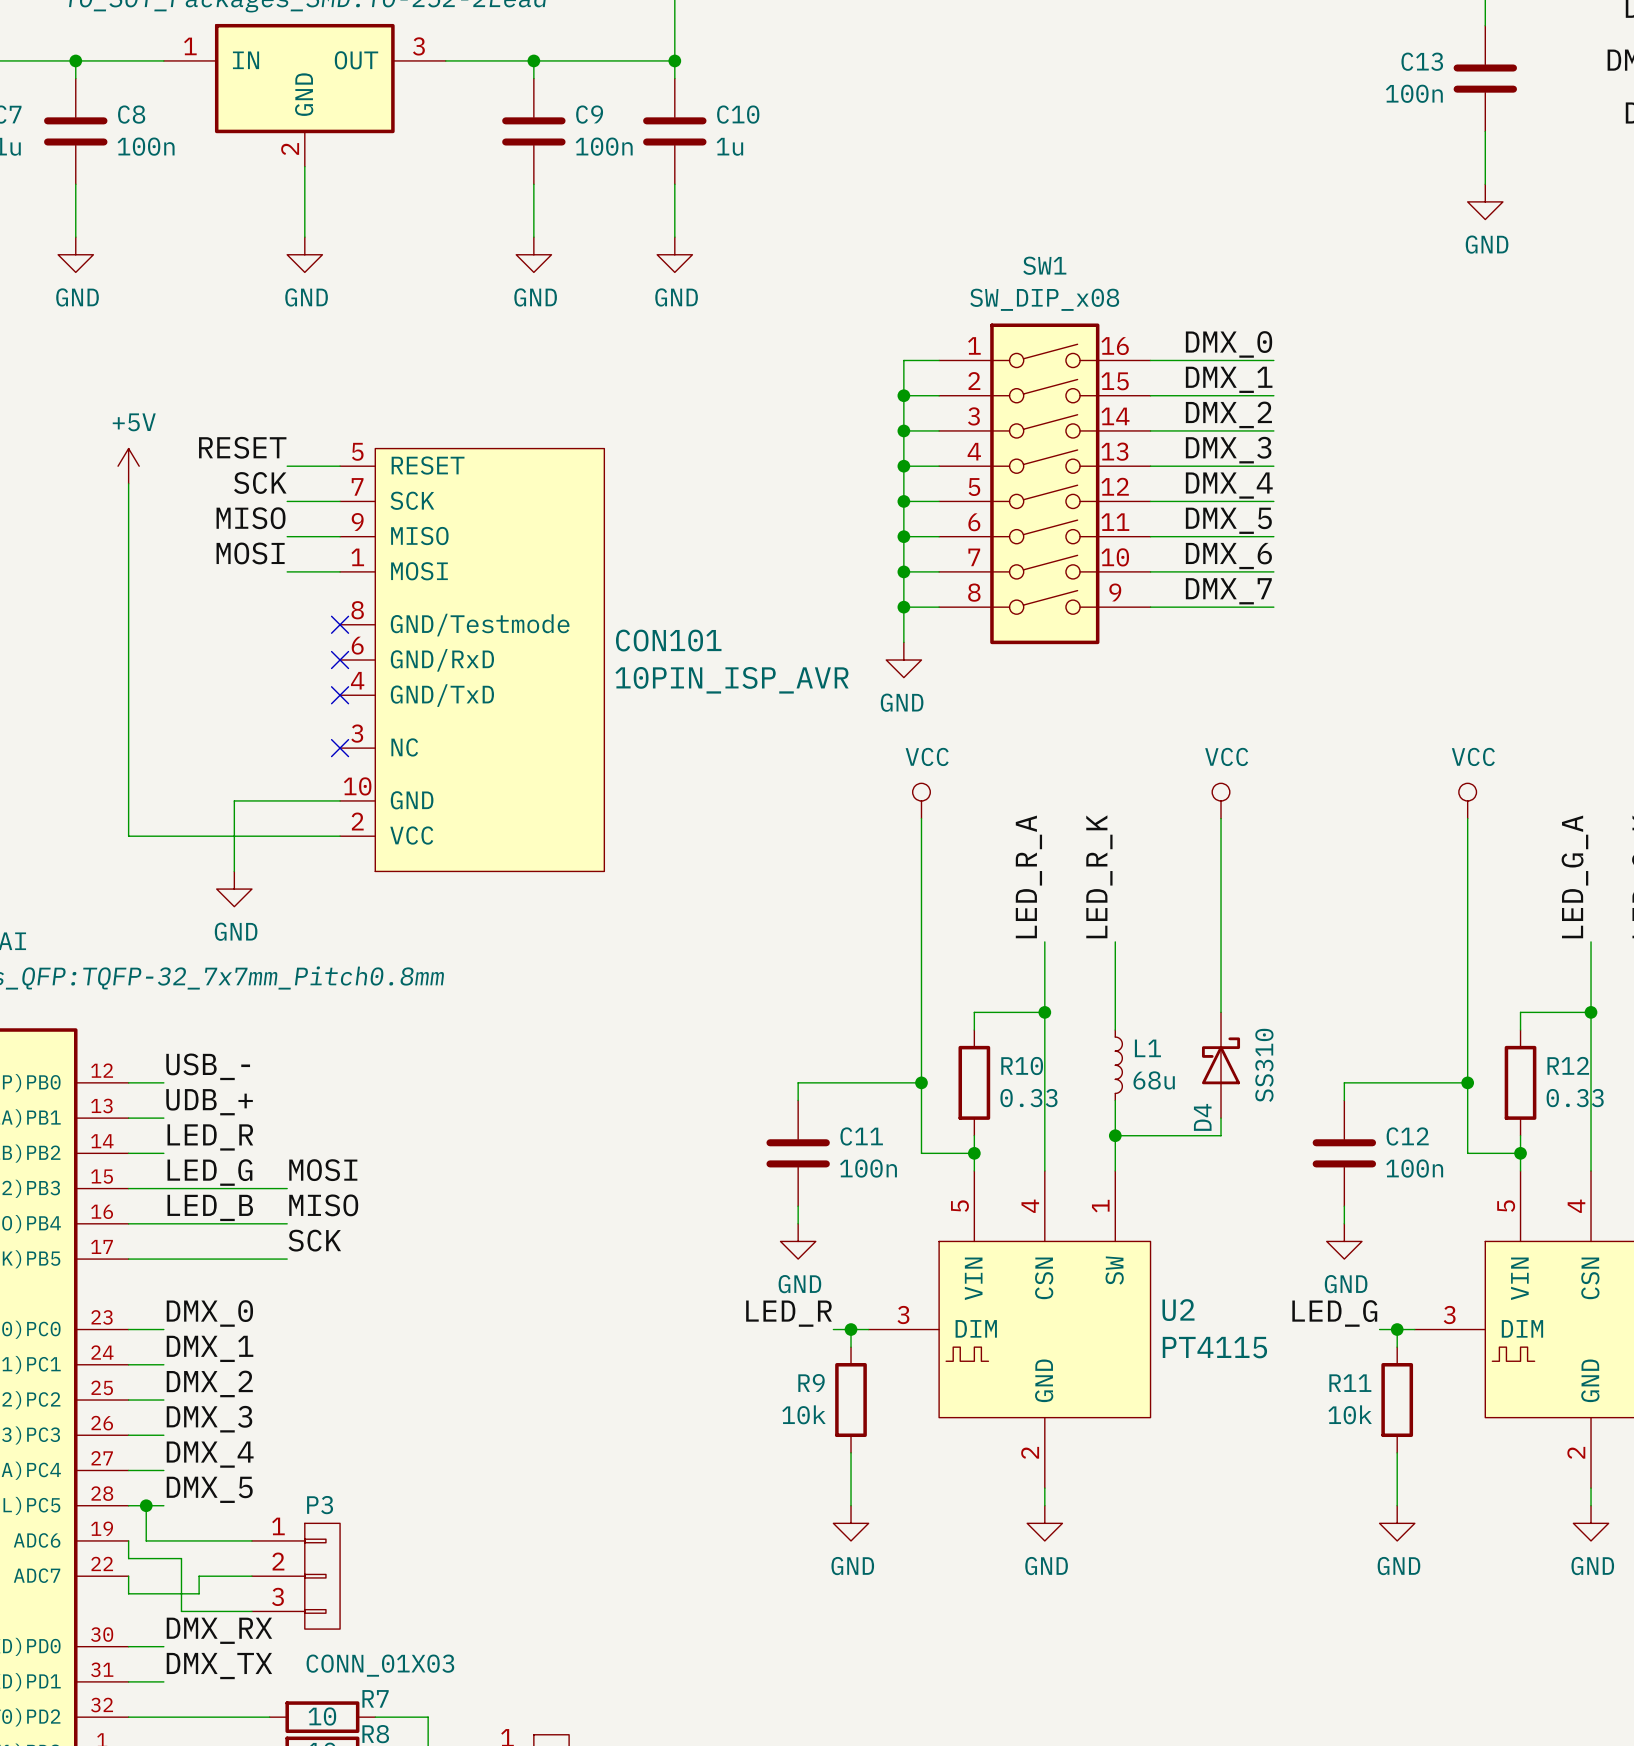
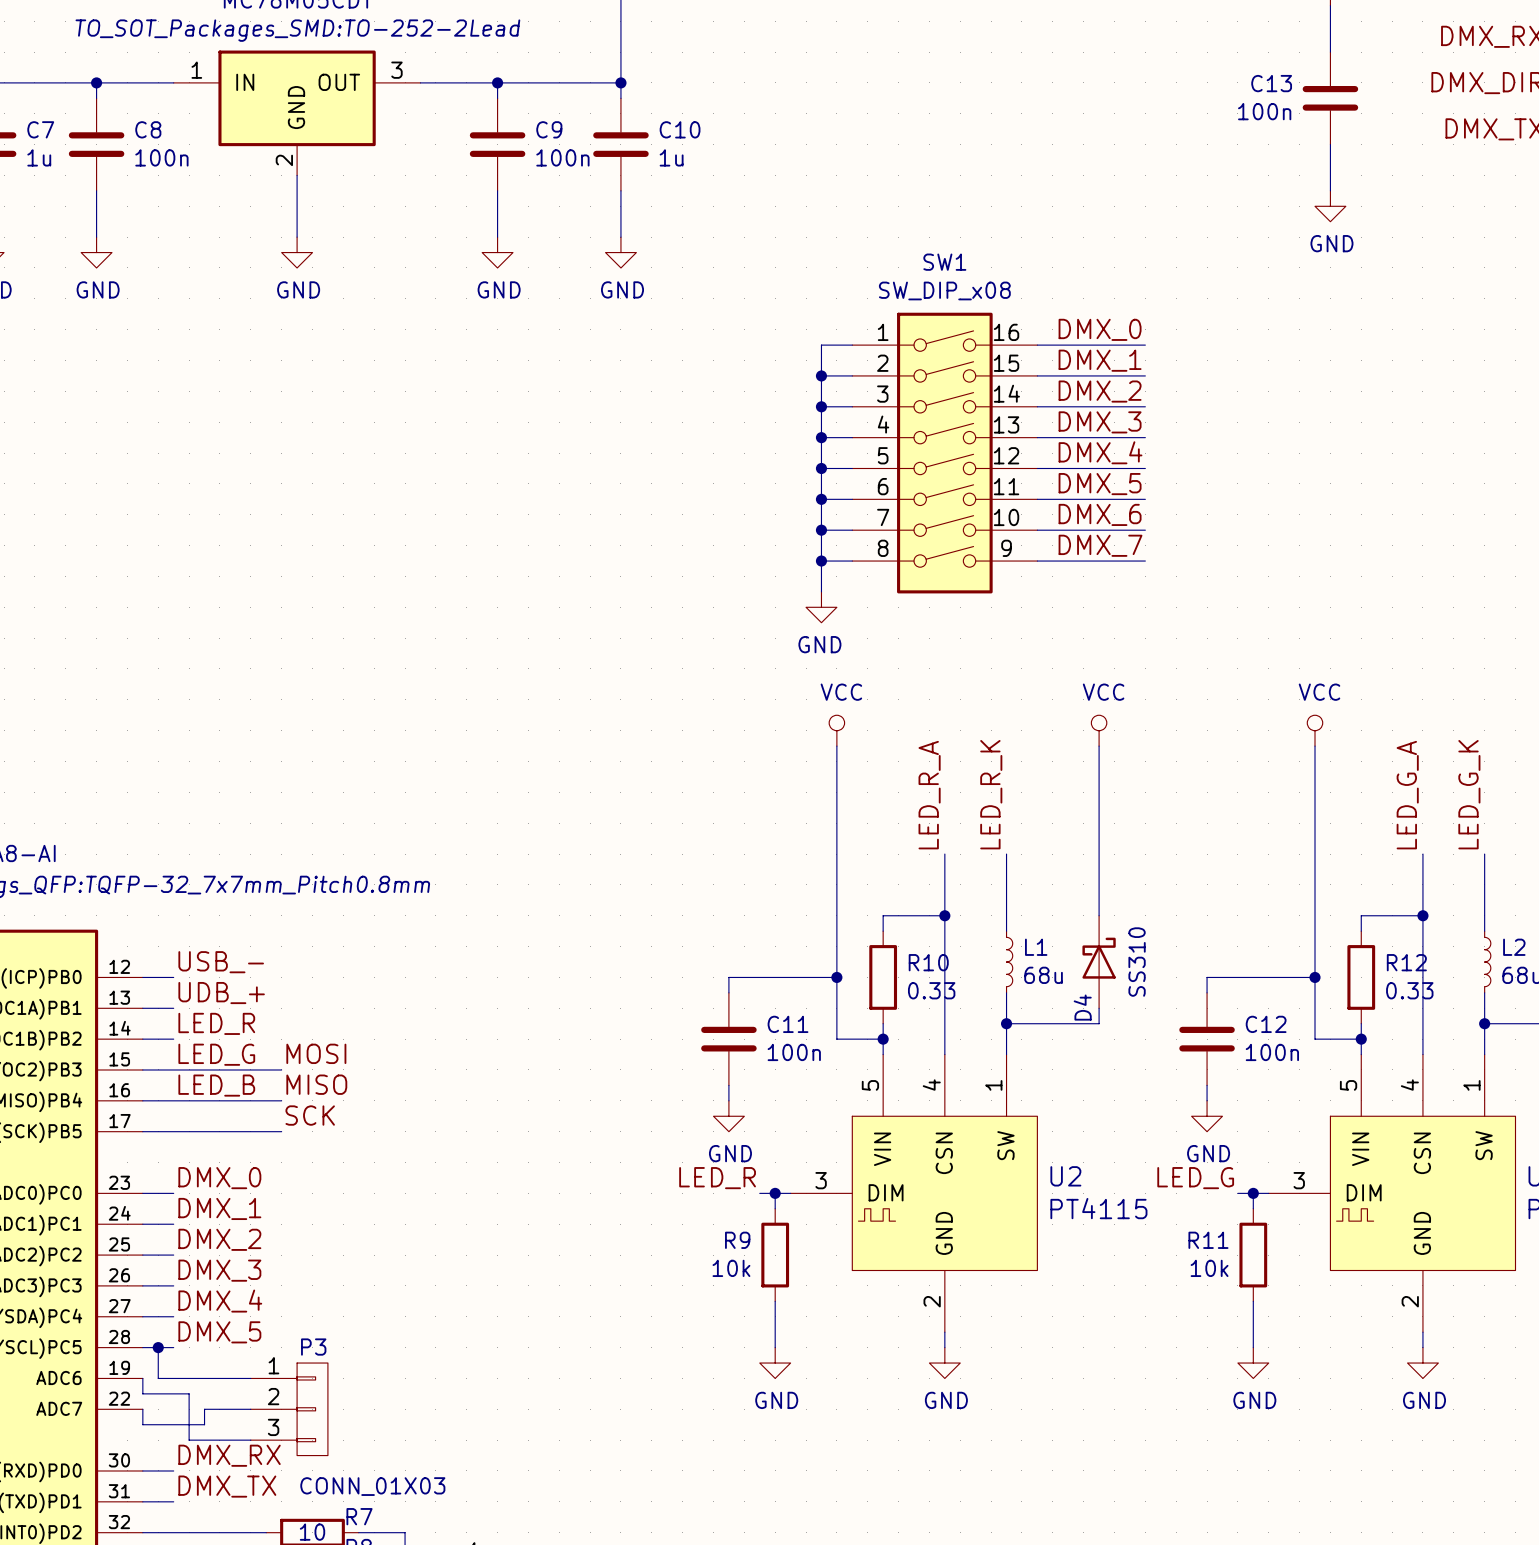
label: RESET (242, 447) -> none
power symbol: +5V (128, 466) -> none
wire: (287, 466) (340, 466) -> none
label: SCK (260, 482) -> none
wire: (128, 483) (128, 836) (340, 836) -> none
wire: (287, 501) (340, 501) -> none
label: MISO (251, 518) -> none
wire: (287, 536) (340, 536) -> none
label: MOSI (250, 553) -> none
wire: (287, 571) (340, 571) -> none
no-connect mark: (340, 624) -> none
no-connect mark: (340, 660) -> none
CON101: 10PIN_ISP_AVR (472, 660) -> none
no-connect mark: (340, 695) -> none
no-connect mark: (340, 748) -> none
wire: (340, 800) (234, 800) (234, 871) -> none
power symbol: GND (234, 889) -> none

